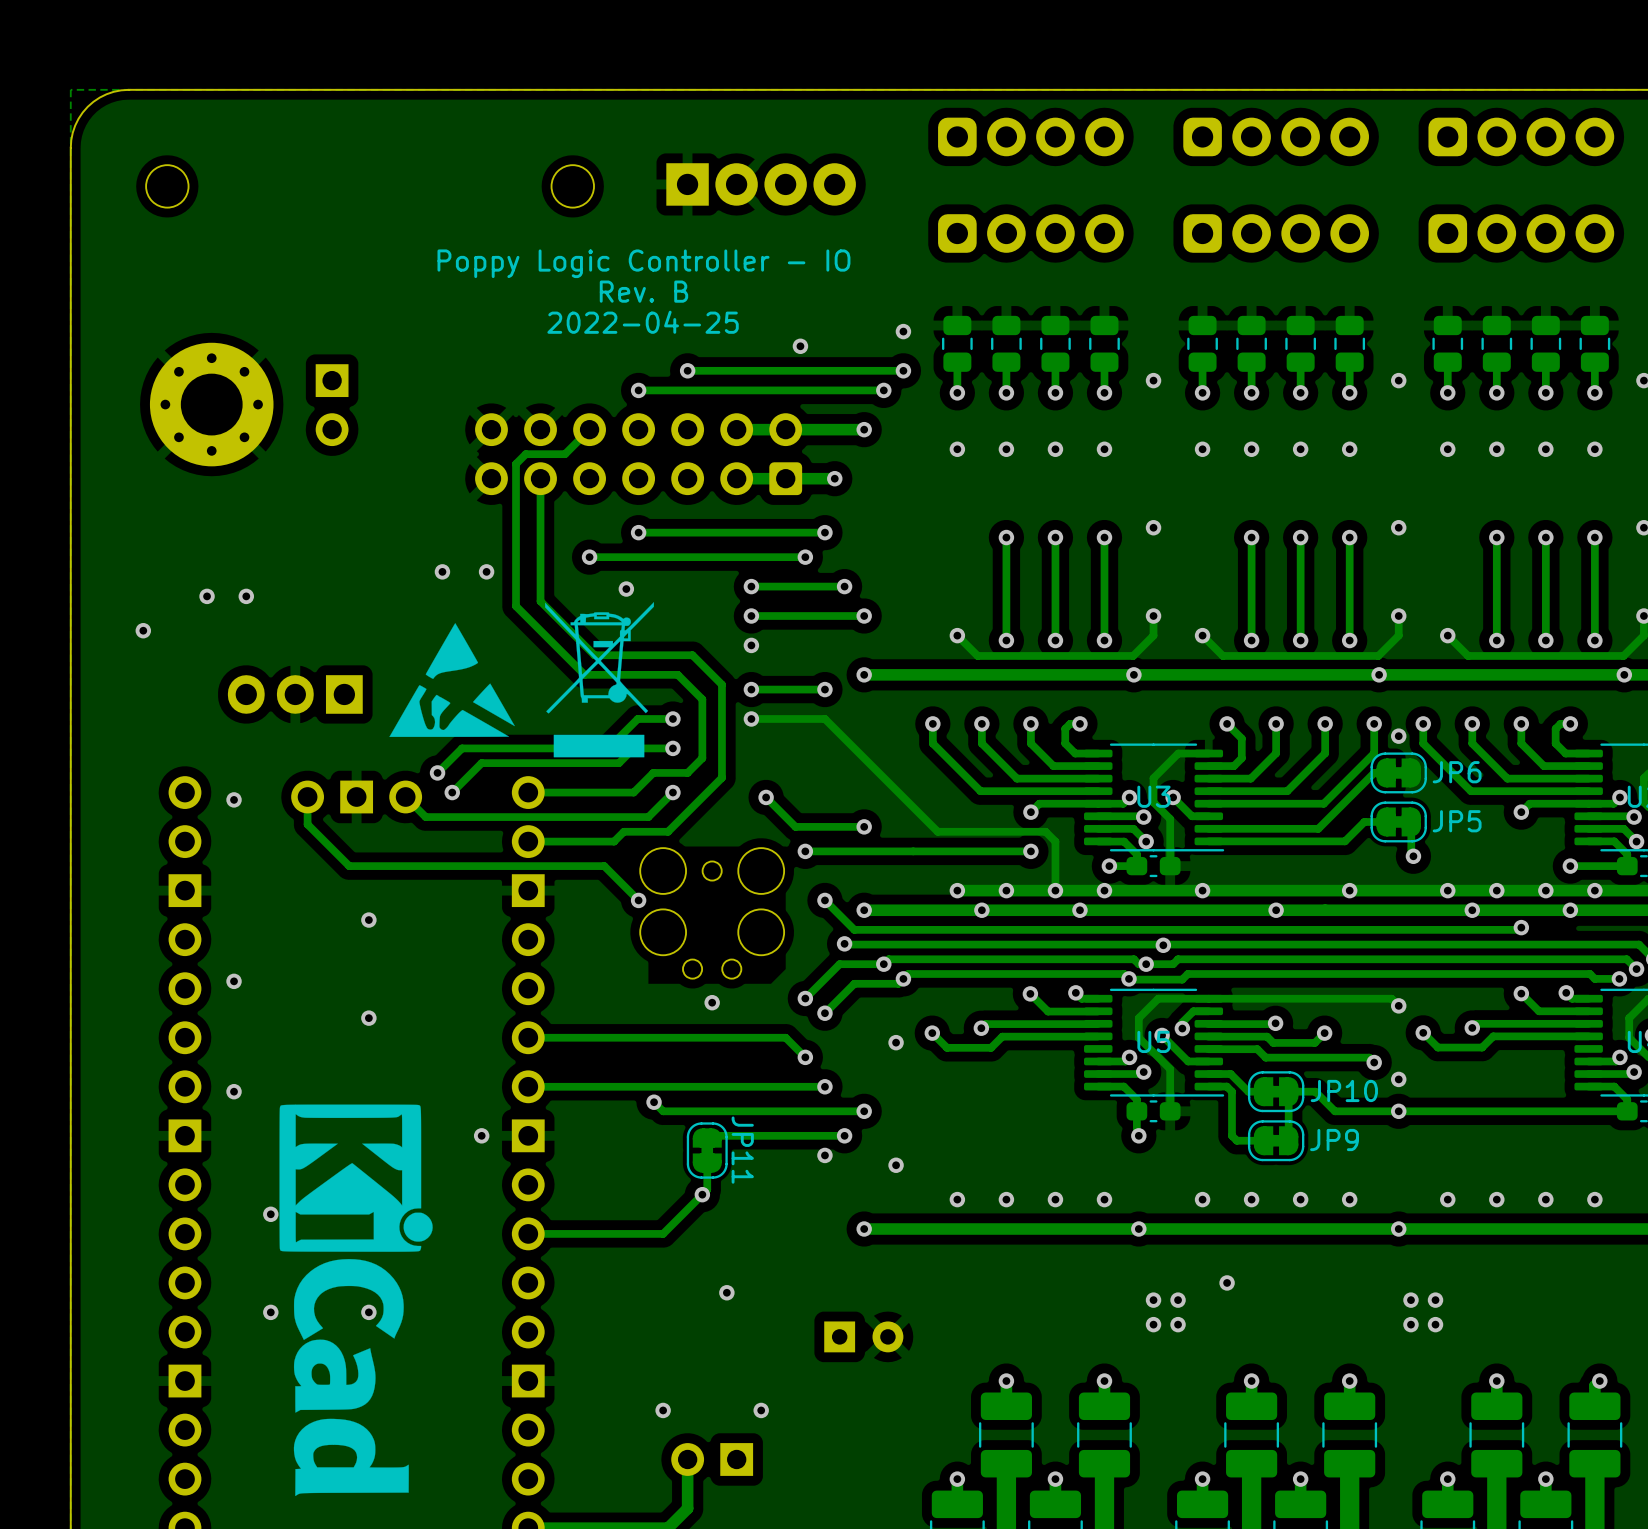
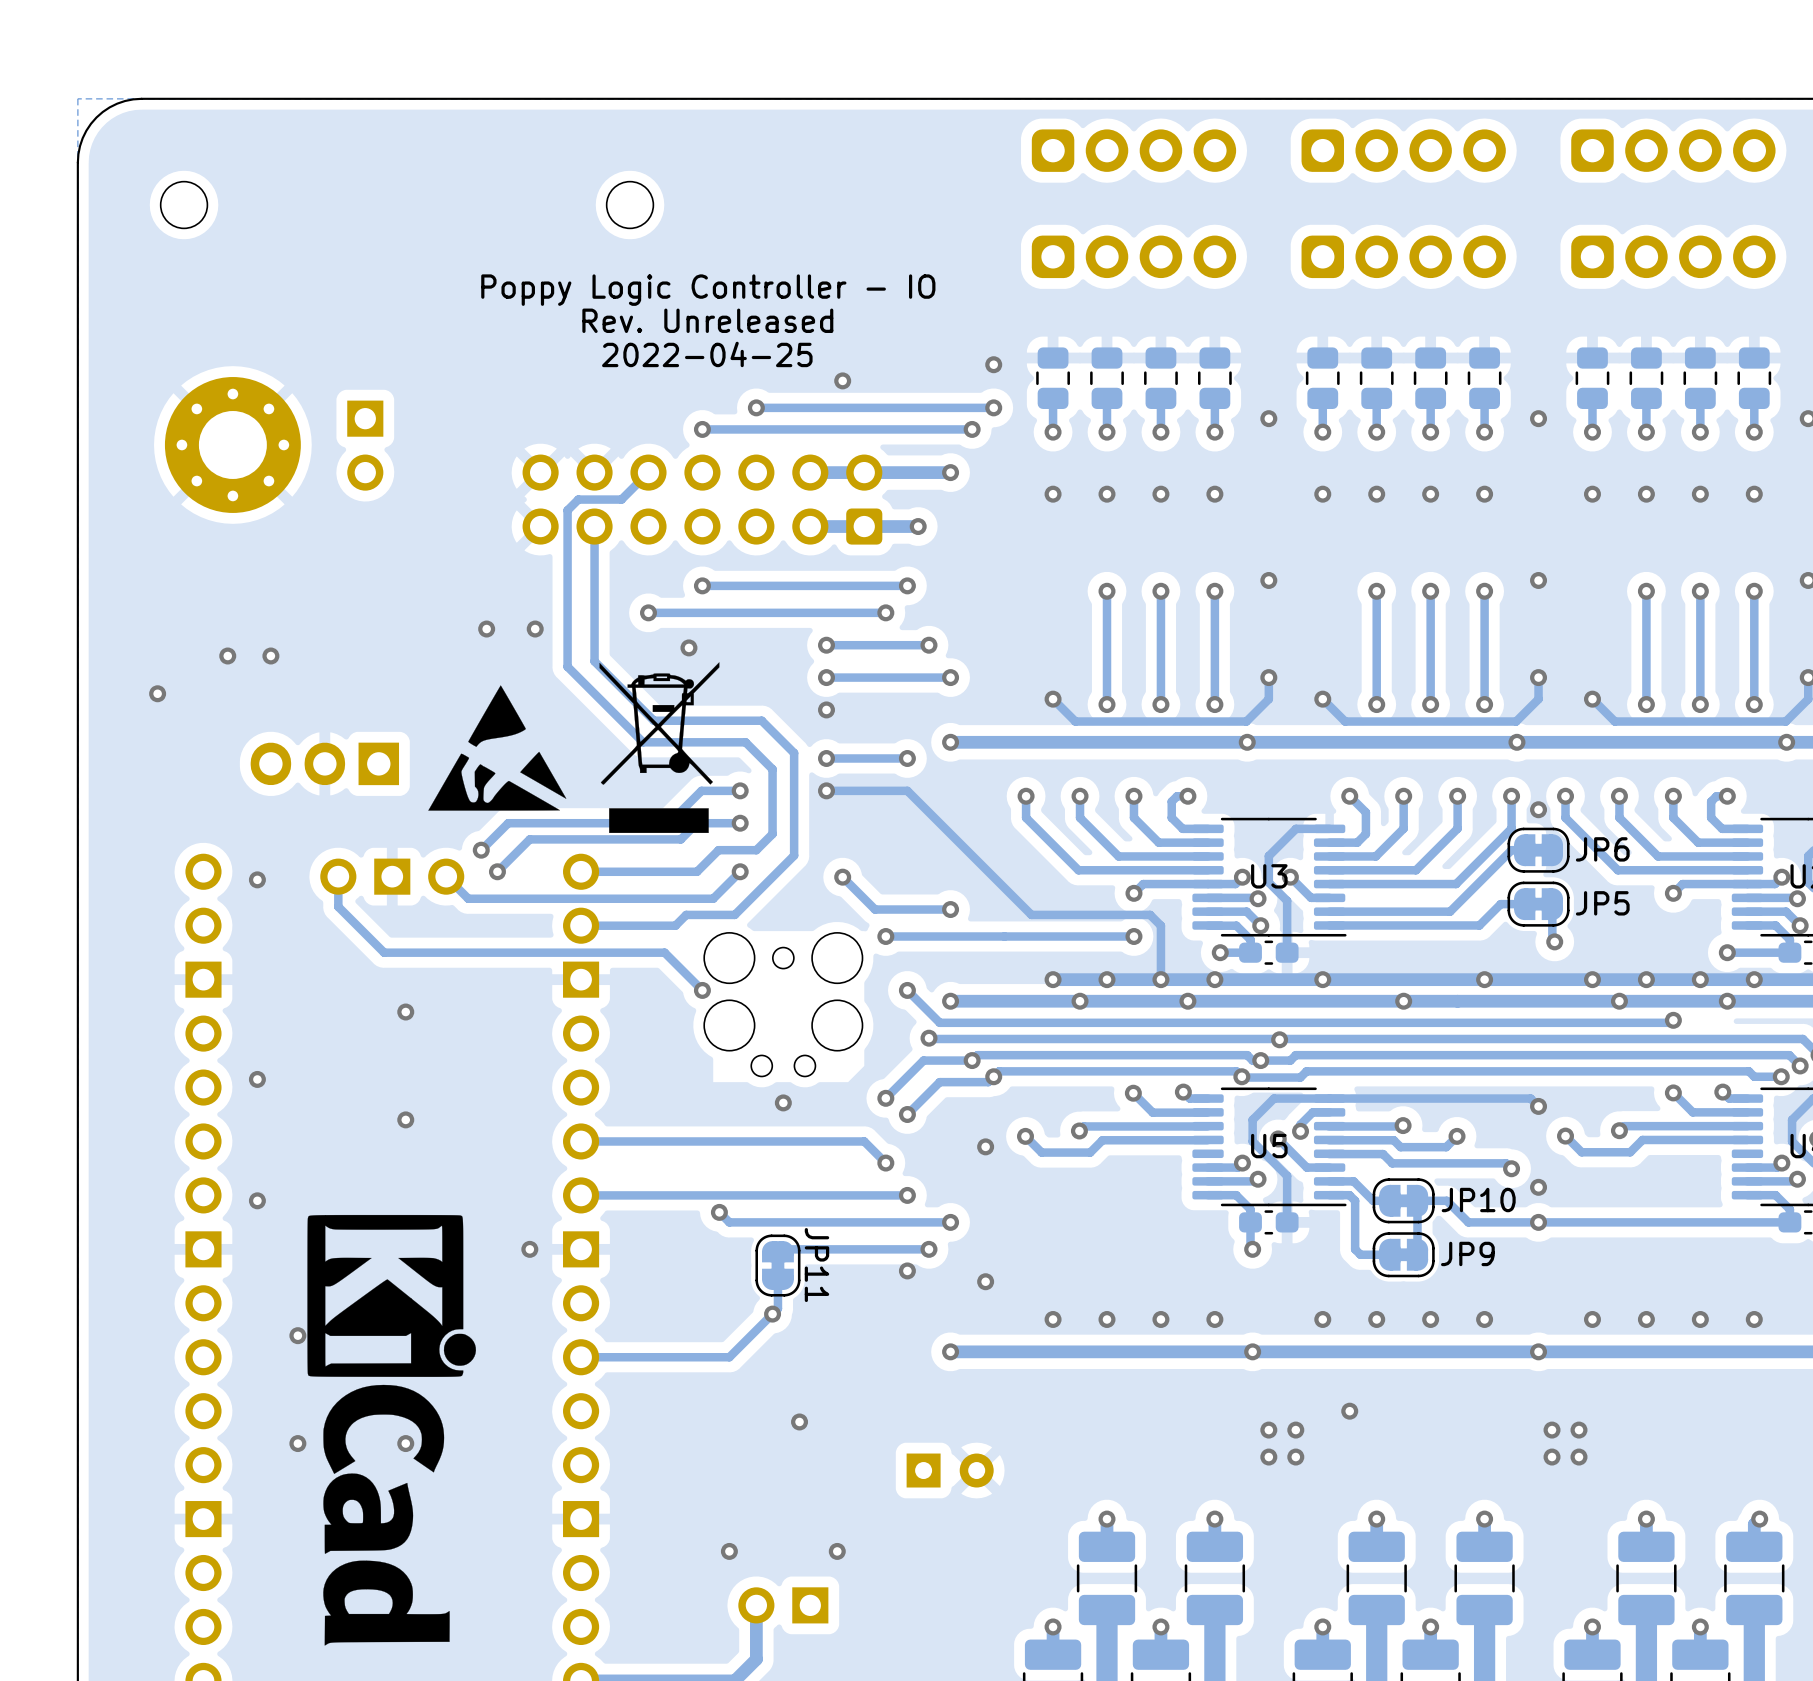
part: (761, 184) -> none
text: Rev. B (643, 291) -> Rev. Unreleased (707, 320)
via position: (800, 346) -> (842, 380)

